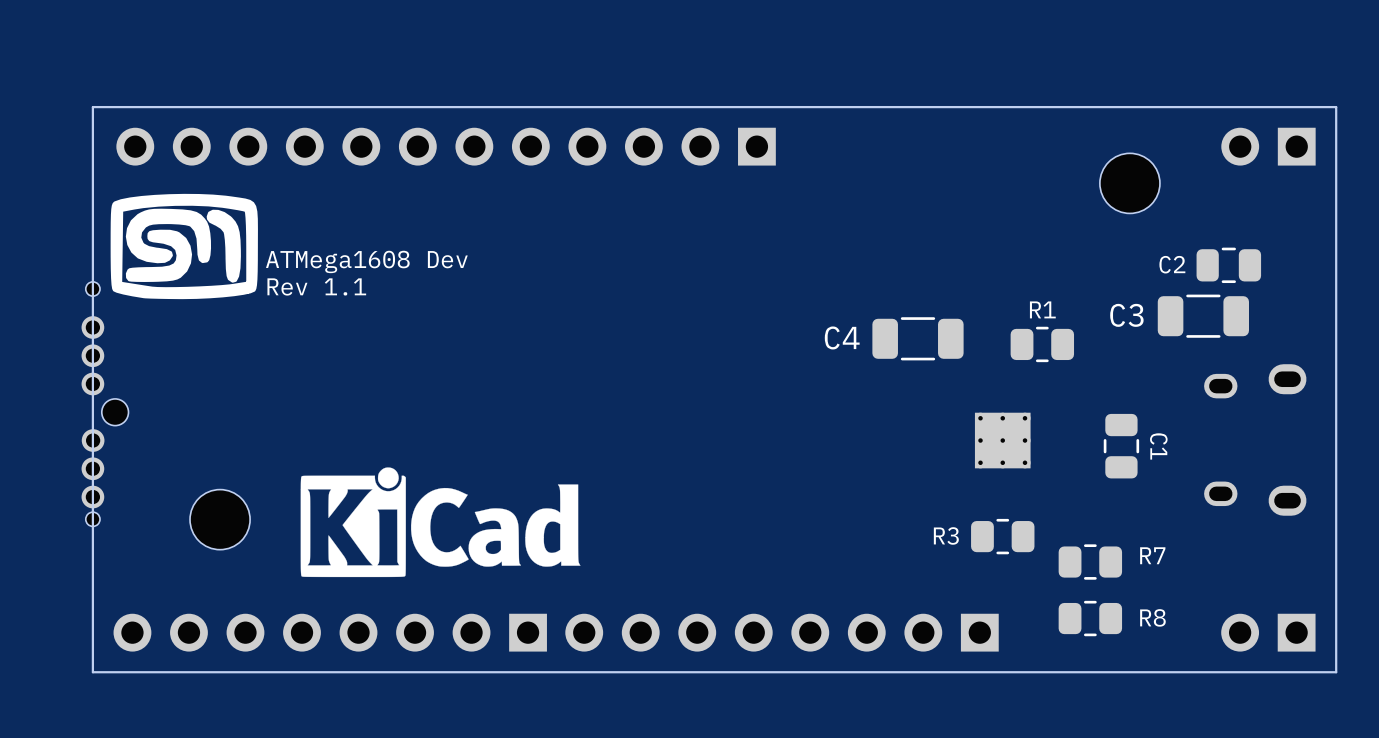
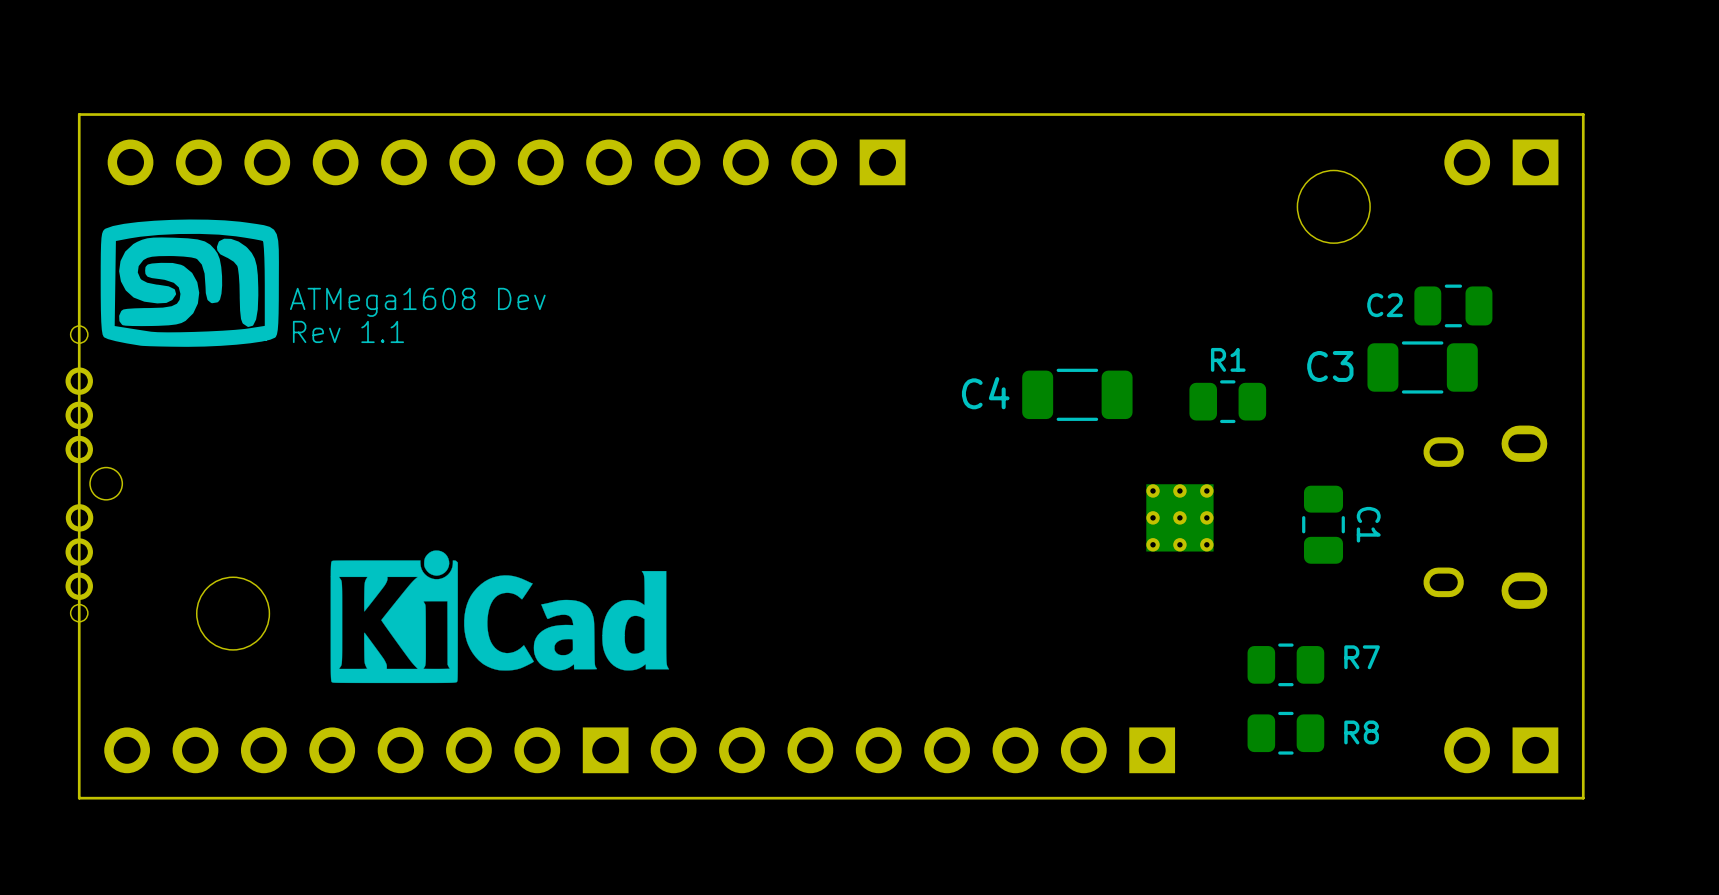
R3: (1002, 536) -> none

